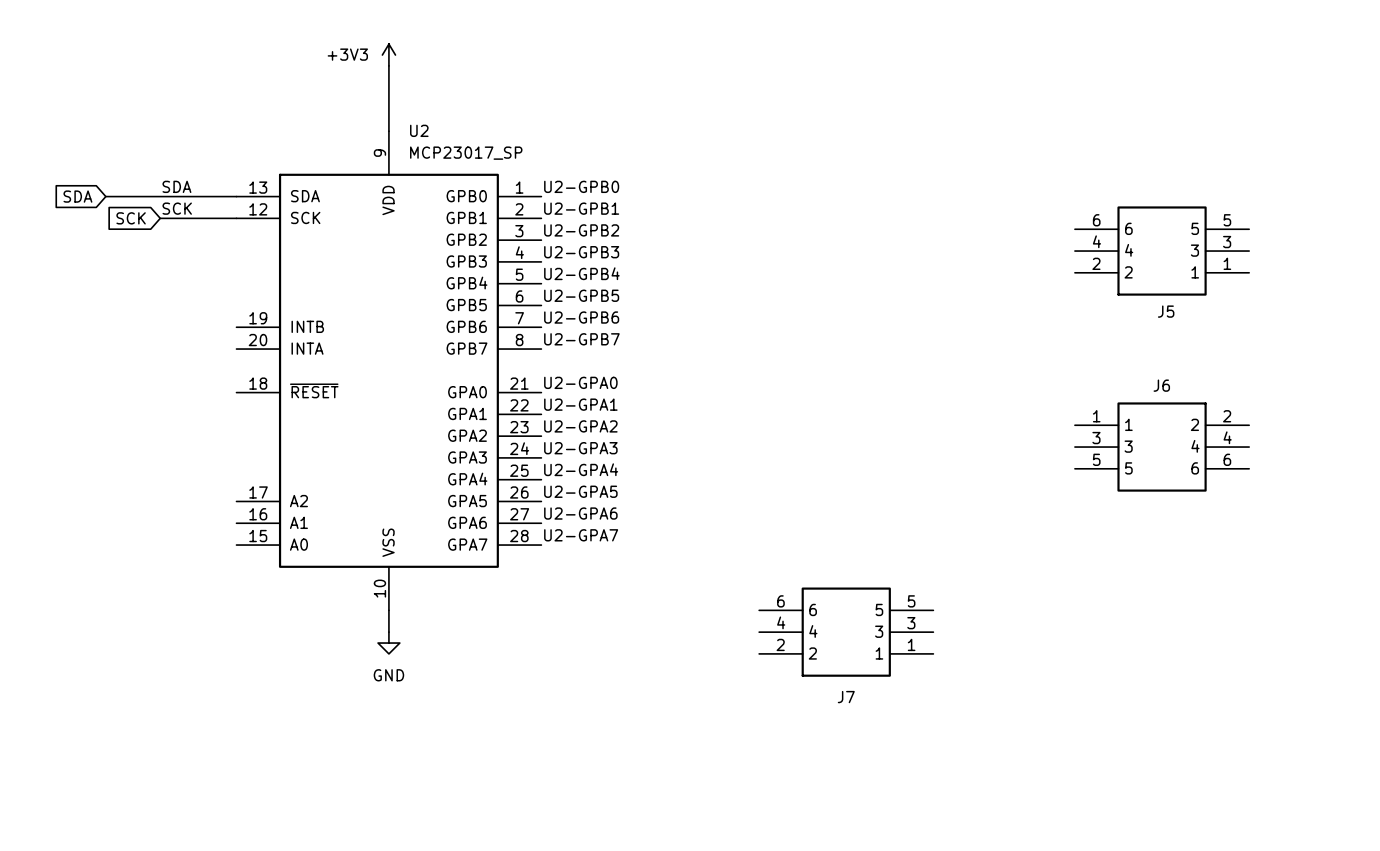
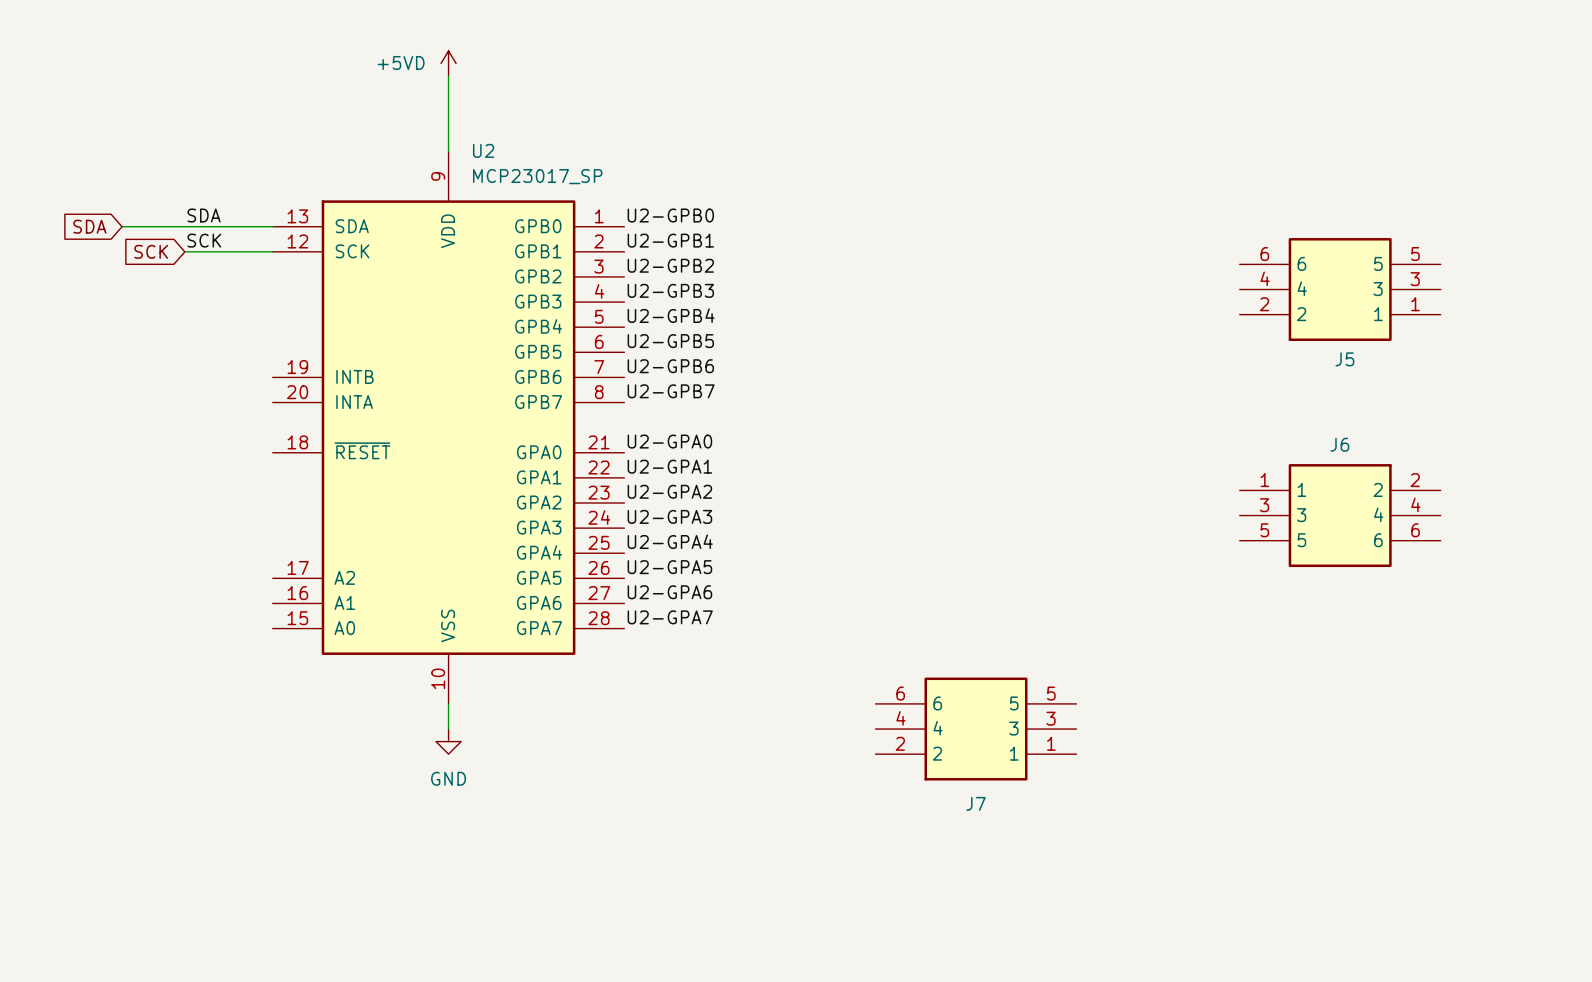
power symbol: +3V3 (388, 55) -> +5VD (448, 63)

